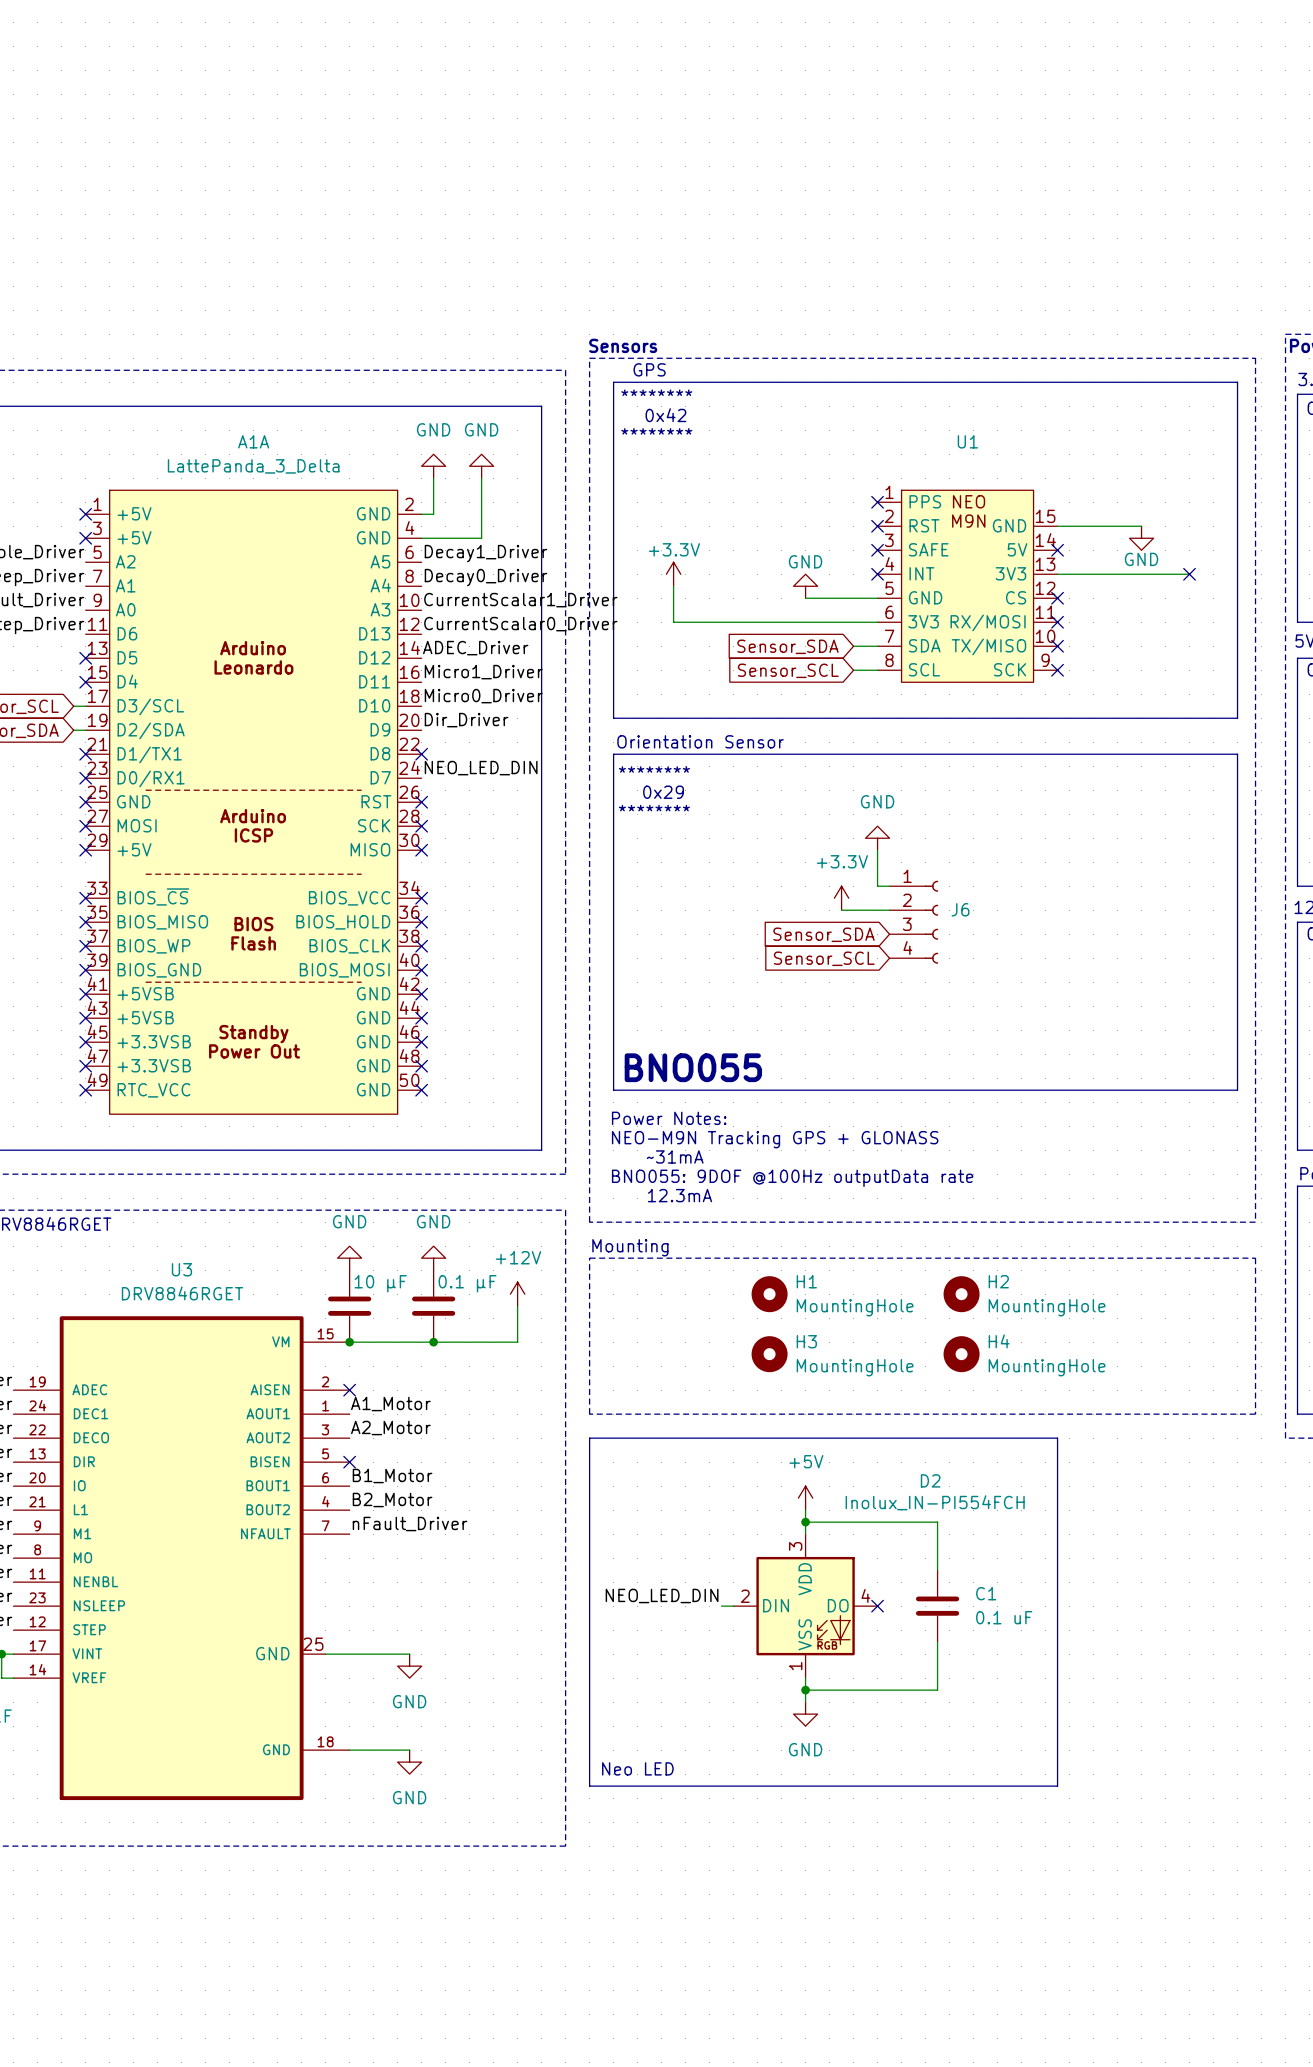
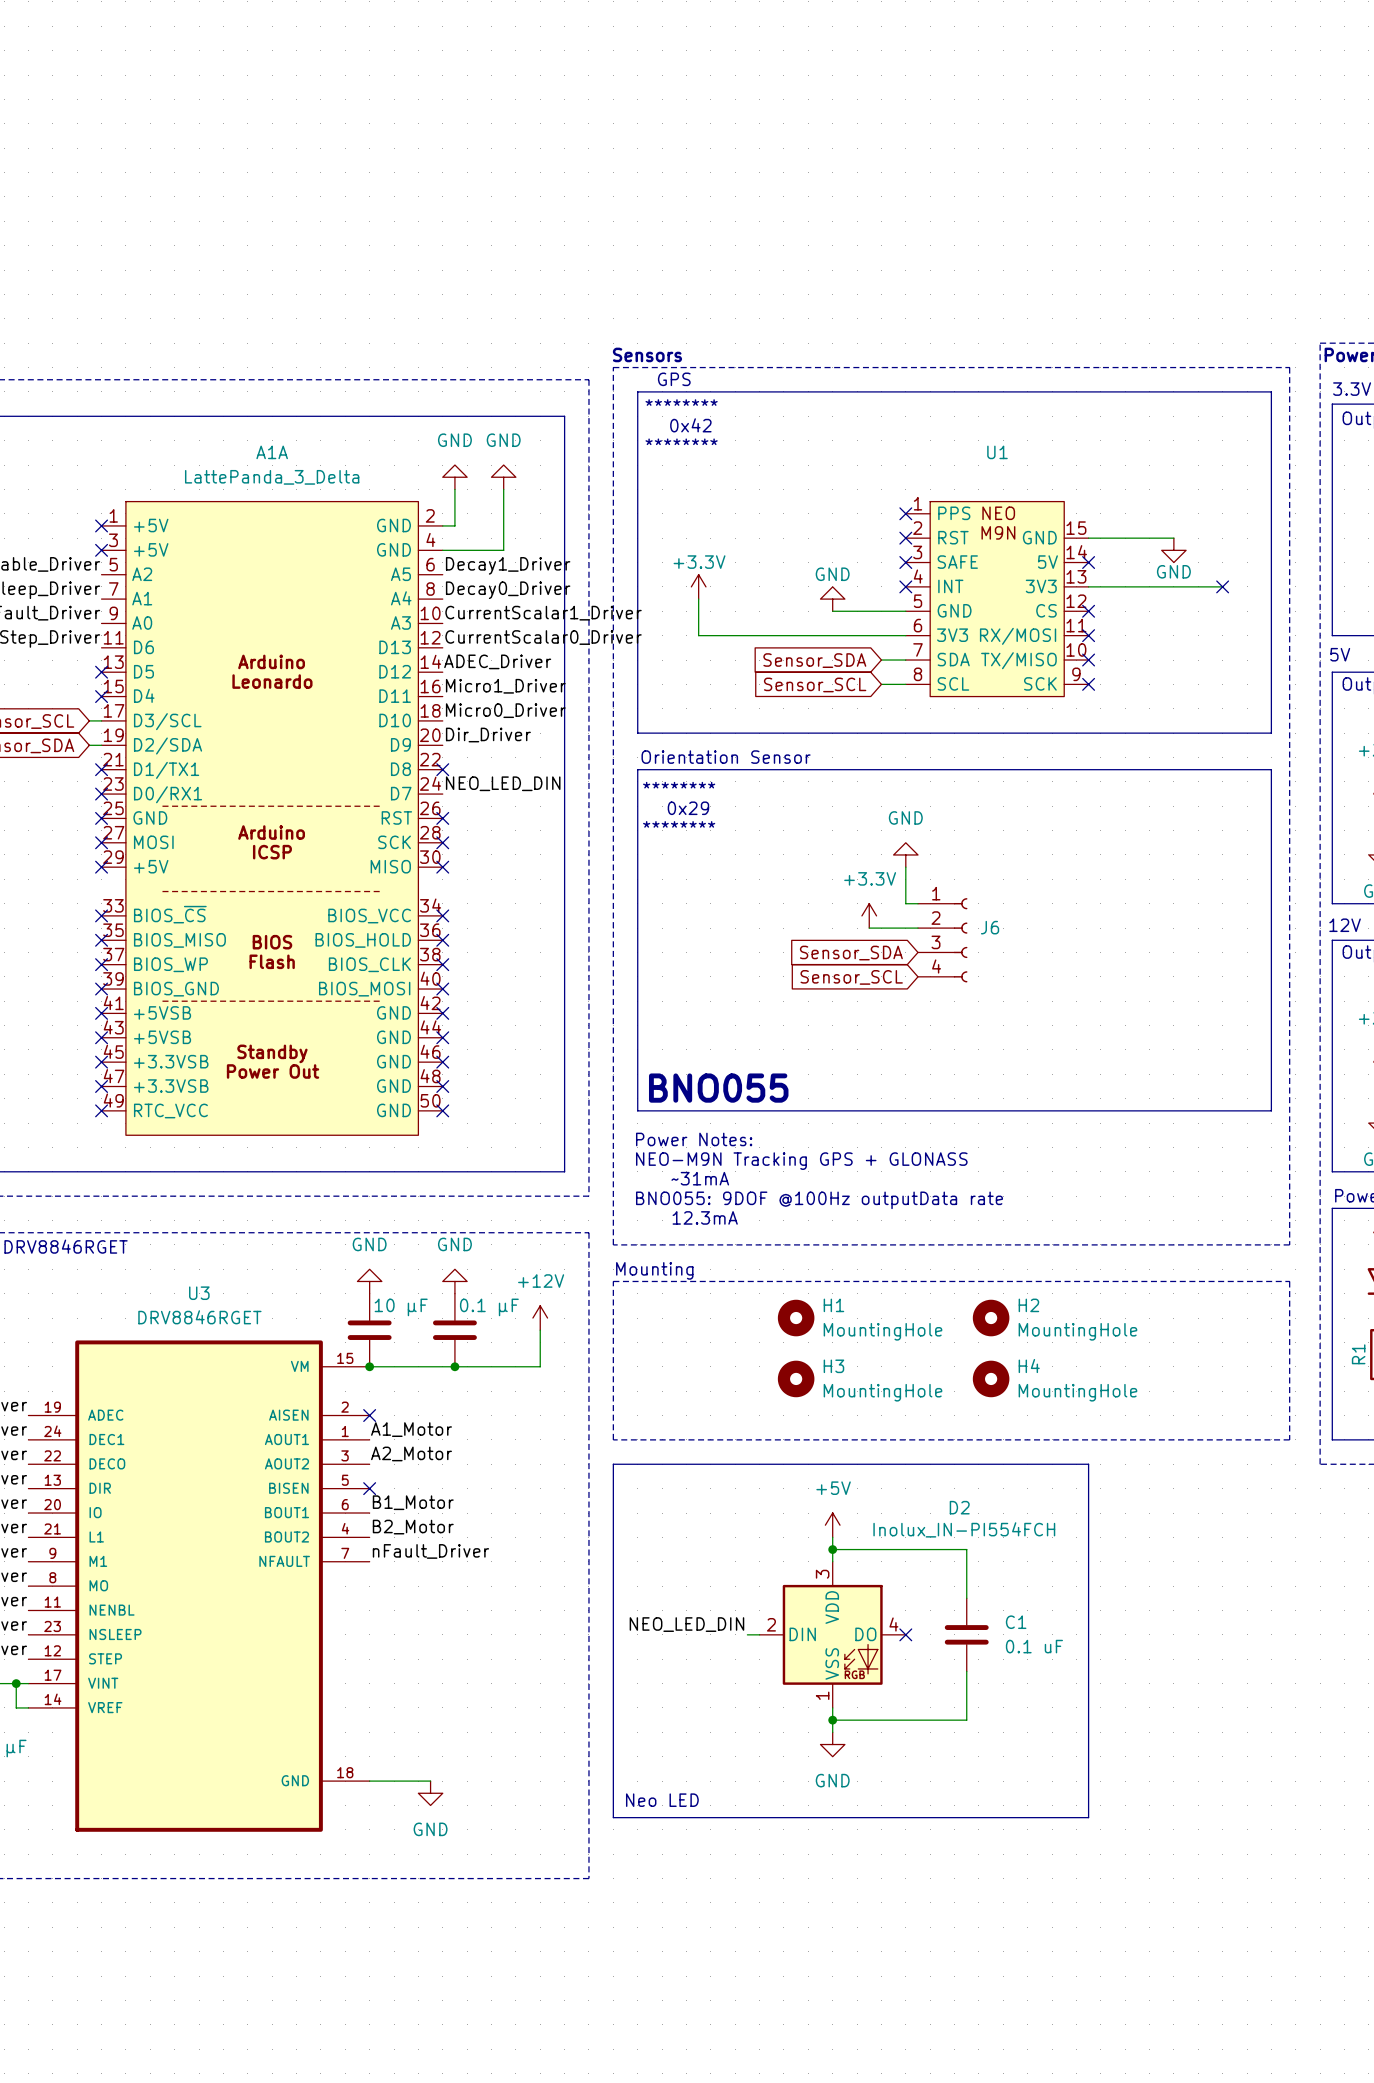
U3 symbol: [13, 1316, 350, 1801] -> [28, 1340, 370, 1832]
wire: (325, 1654) (409, 1654) -> none
power symbol: GND (409, 1666) -> none

